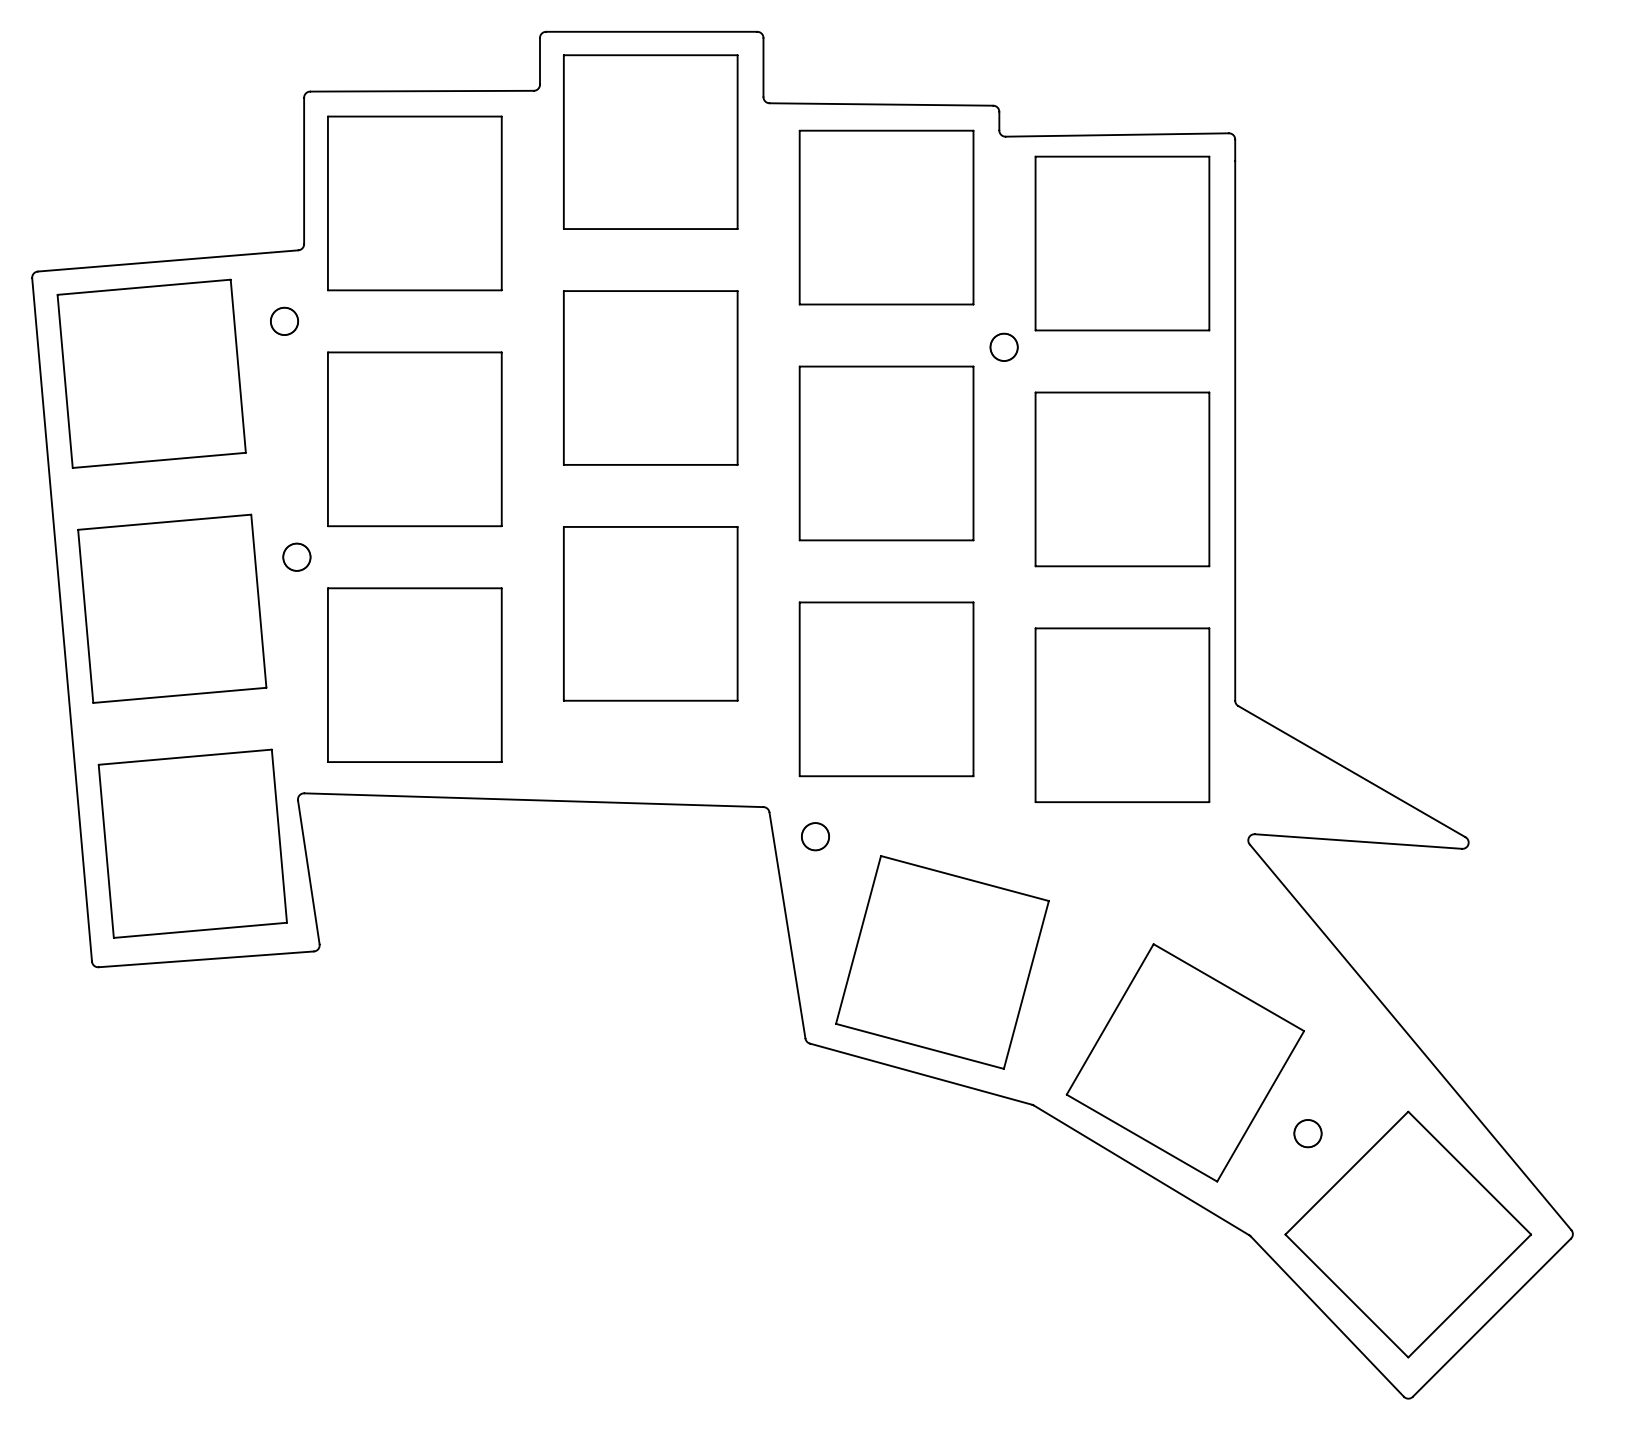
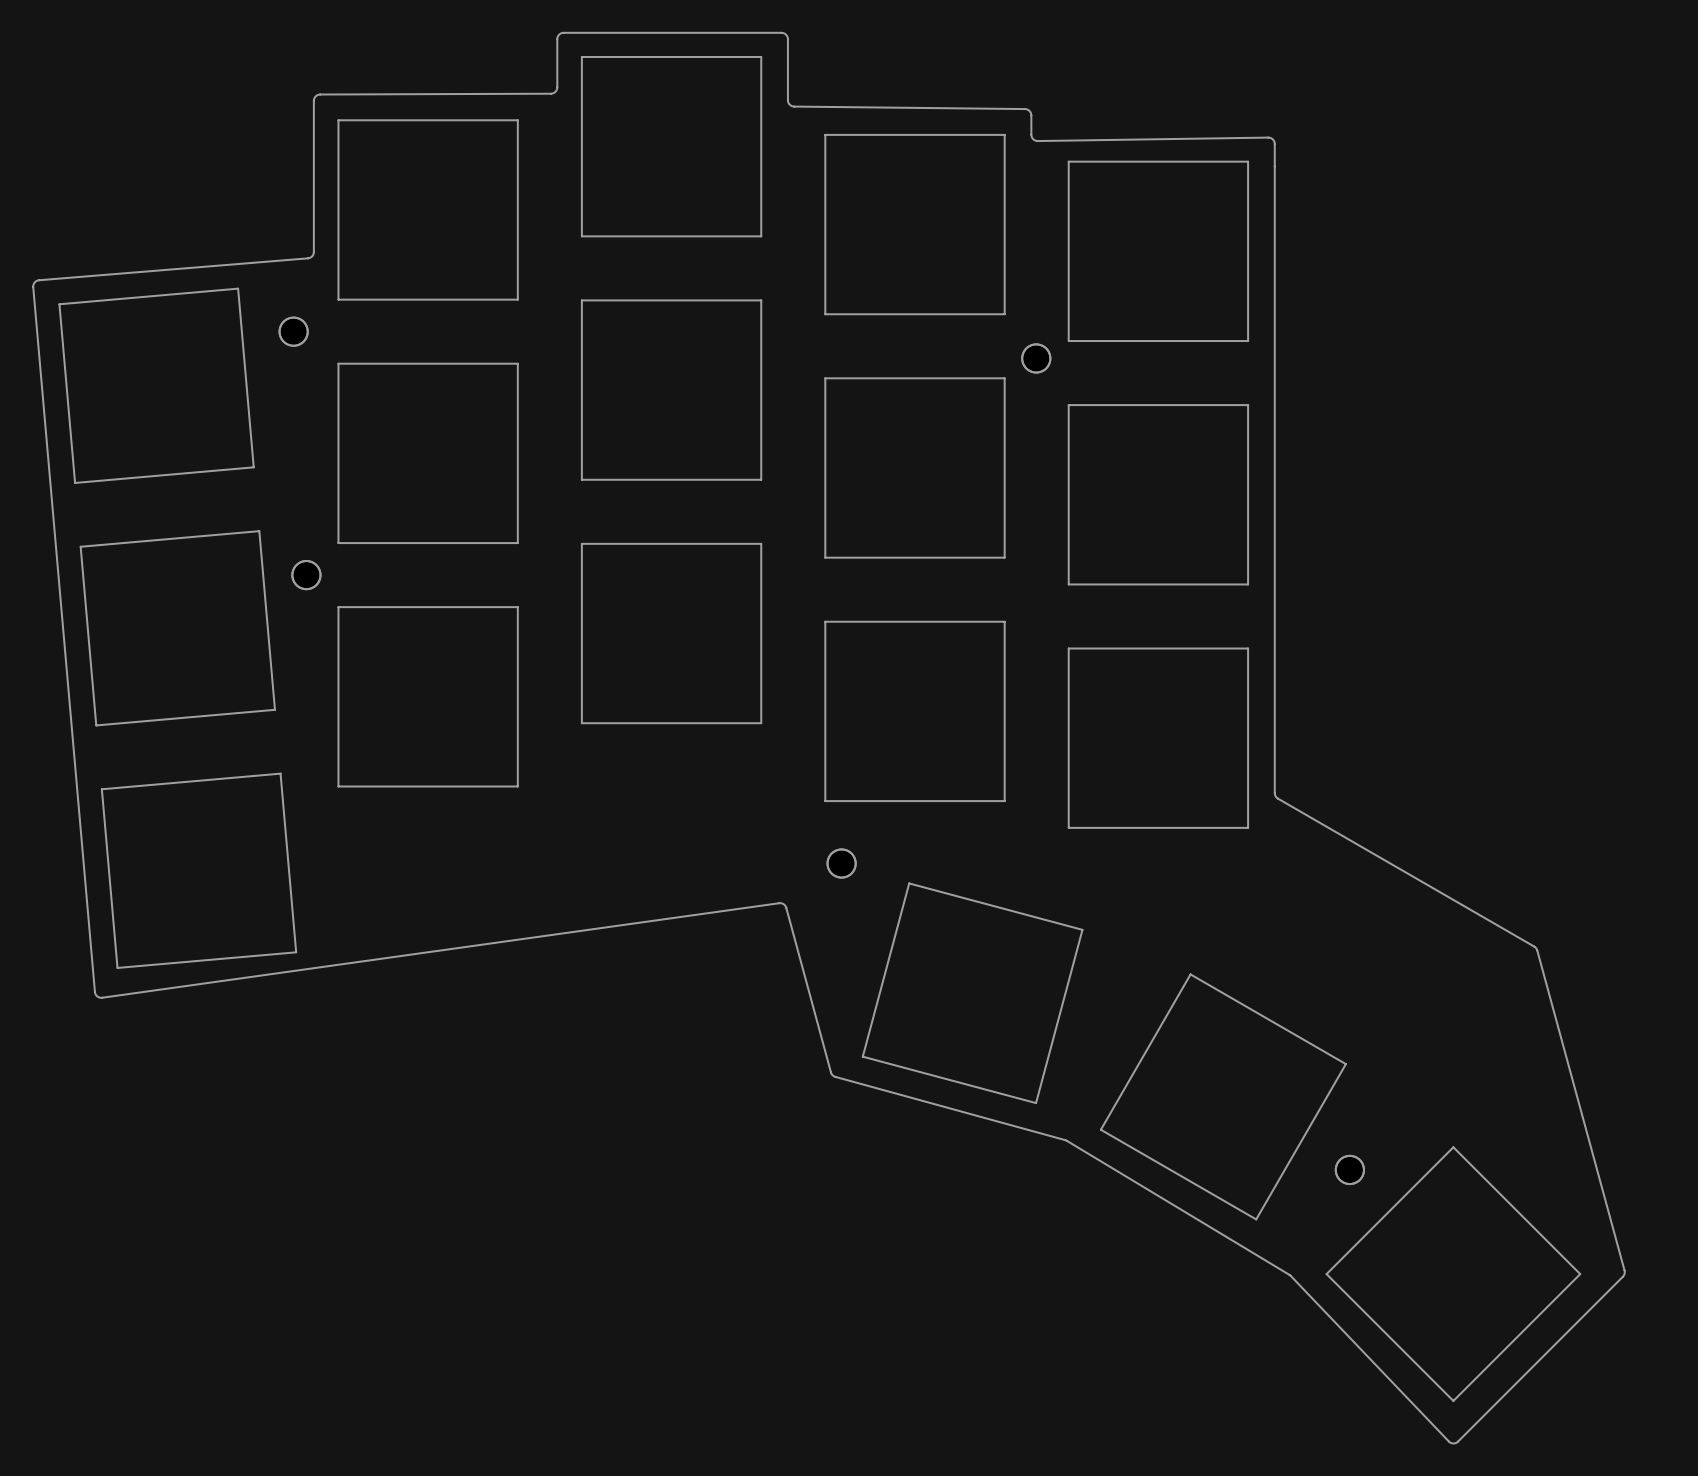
board edge: (1235, 700) (1238, 706) (1467, 839) (1468, 845) (1462, 848) (1254, 834) (1250, 835) (1248, 840) (1571, 1230) (1572, 1234) (1571, 1238) -> (1274, 723) (1274, 793) (1277, 798) (1536, 948) (1624, 1270) (1621, 1278)
board edge: (91, 961) (94, 965) (98, 967) (317, 950) (319, 944) (298, 800) (299, 796) (302, 793) (764, 807) (769, 812) (805, 1038) (809, 1043) -> (94, 991) (97, 996) (102, 997) (780, 903) (786, 907) (830, 1072) (835, 1077)

